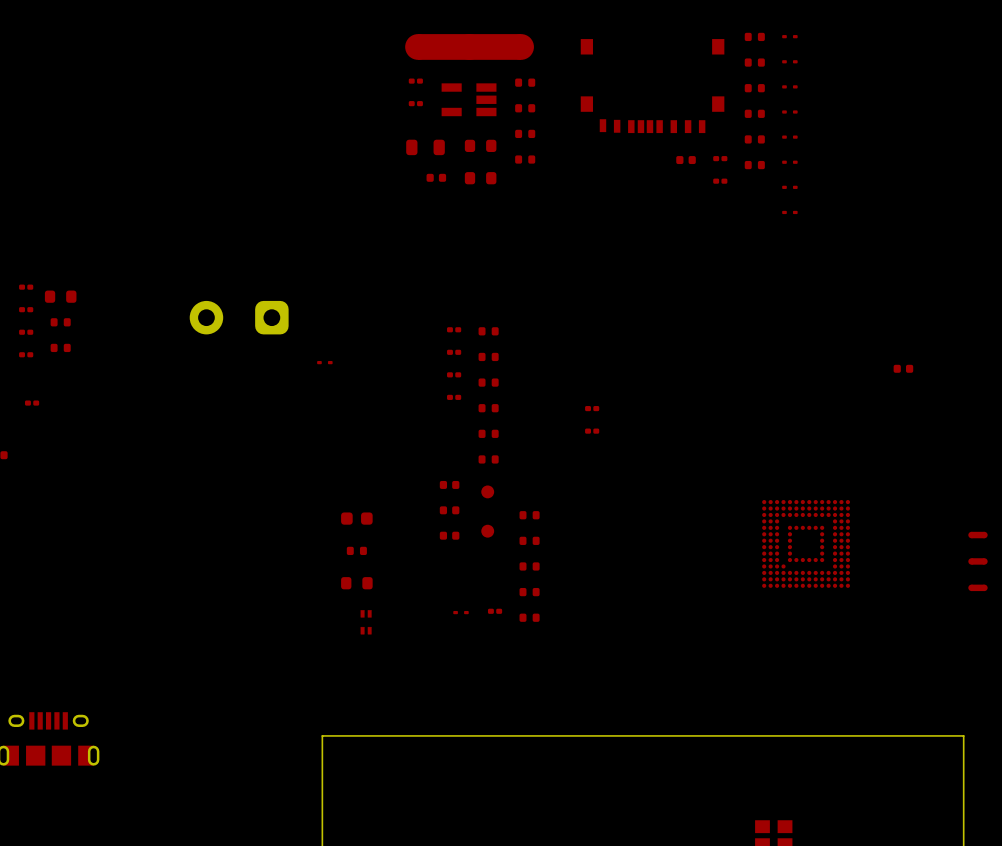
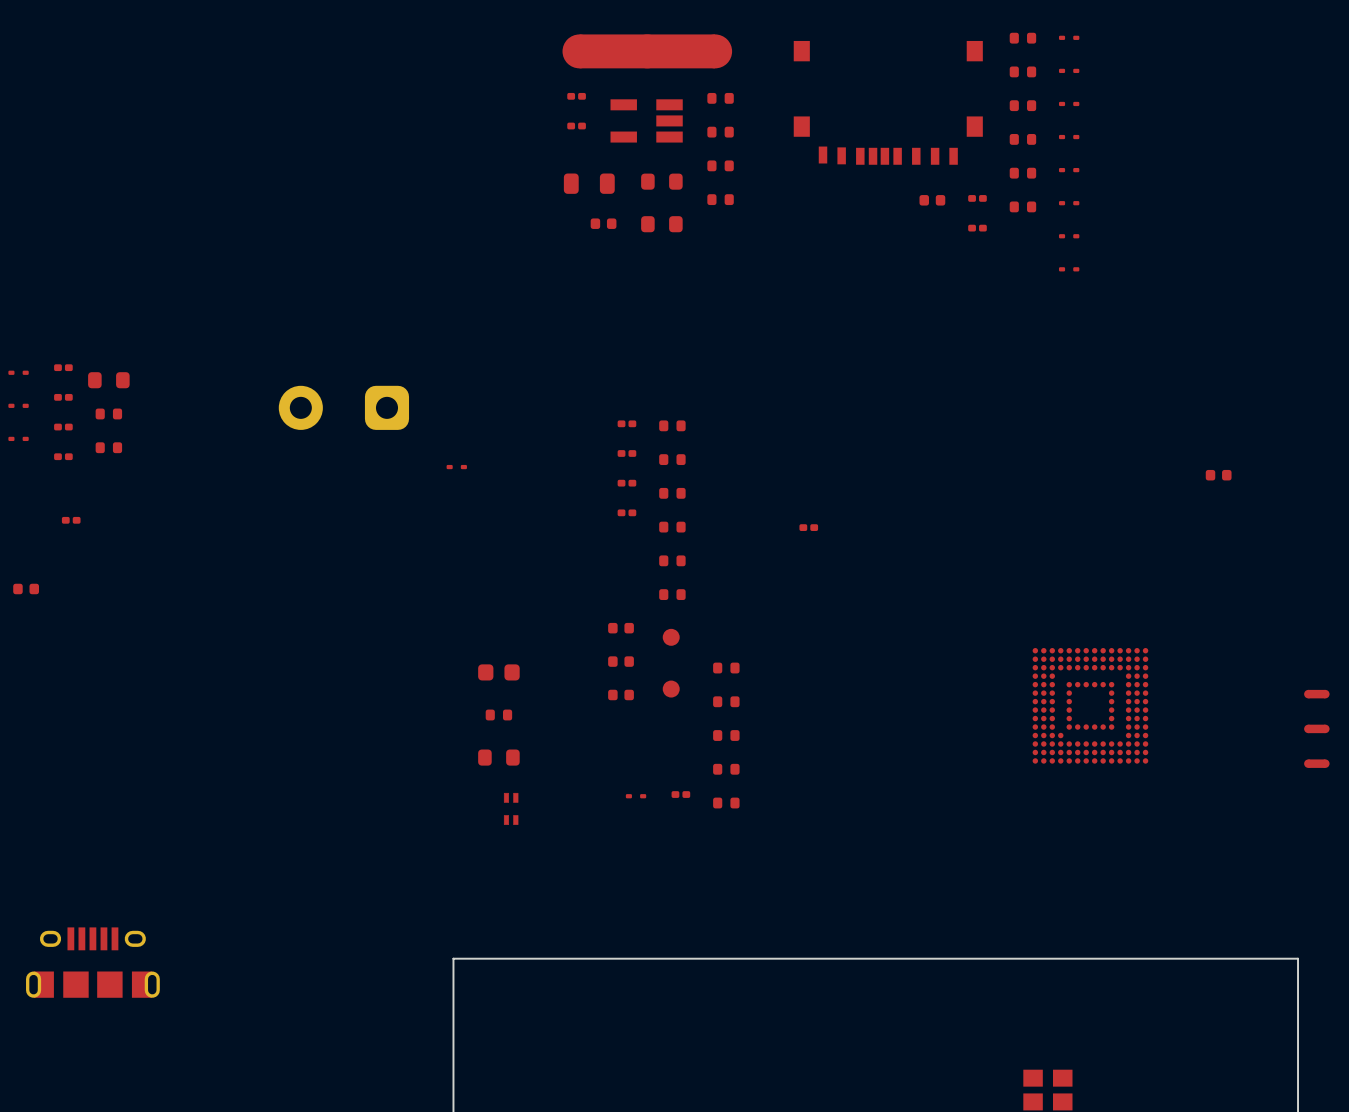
part: (592, 431) -> none

